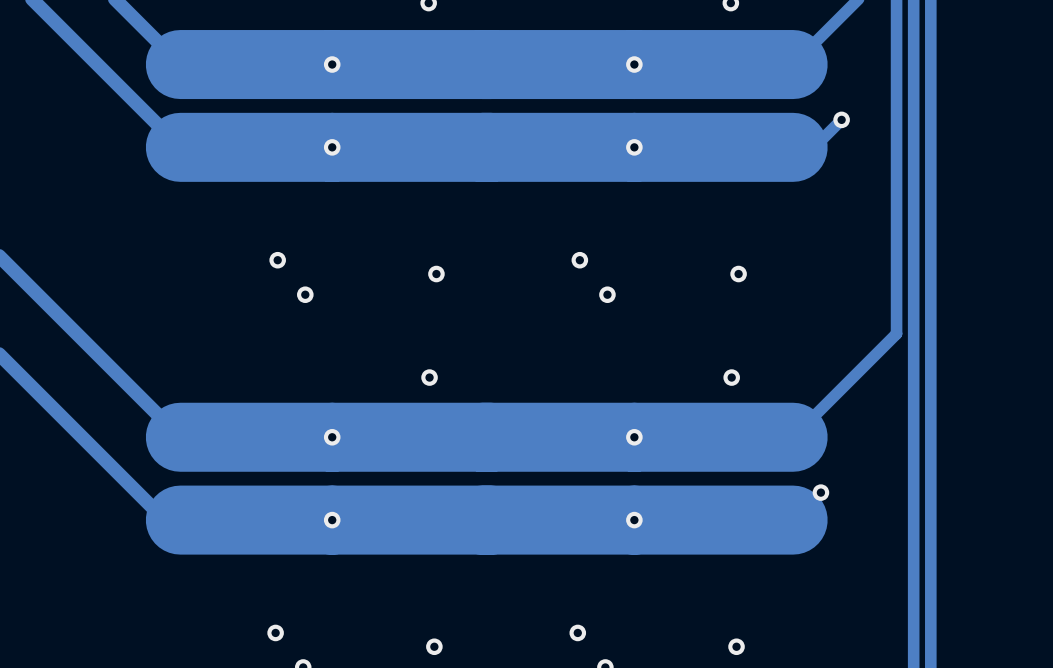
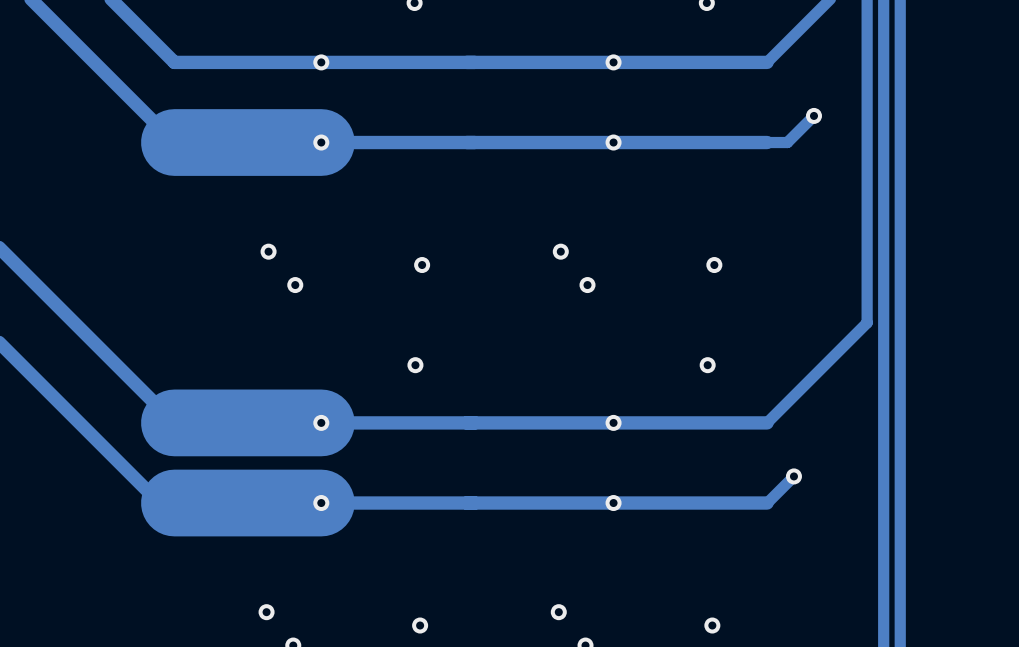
track width: thick (793, 64) (180, 64) -> thin (767, 62) (174, 62)
track width: thick (793, 147) (332, 147) -> thin (767, 142) (321, 142)
track width: thick (793, 437) (332, 437) -> thin (767, 422) (321, 422)
track width: thick (793, 520) (332, 520) -> thin (767, 503) (321, 503)

